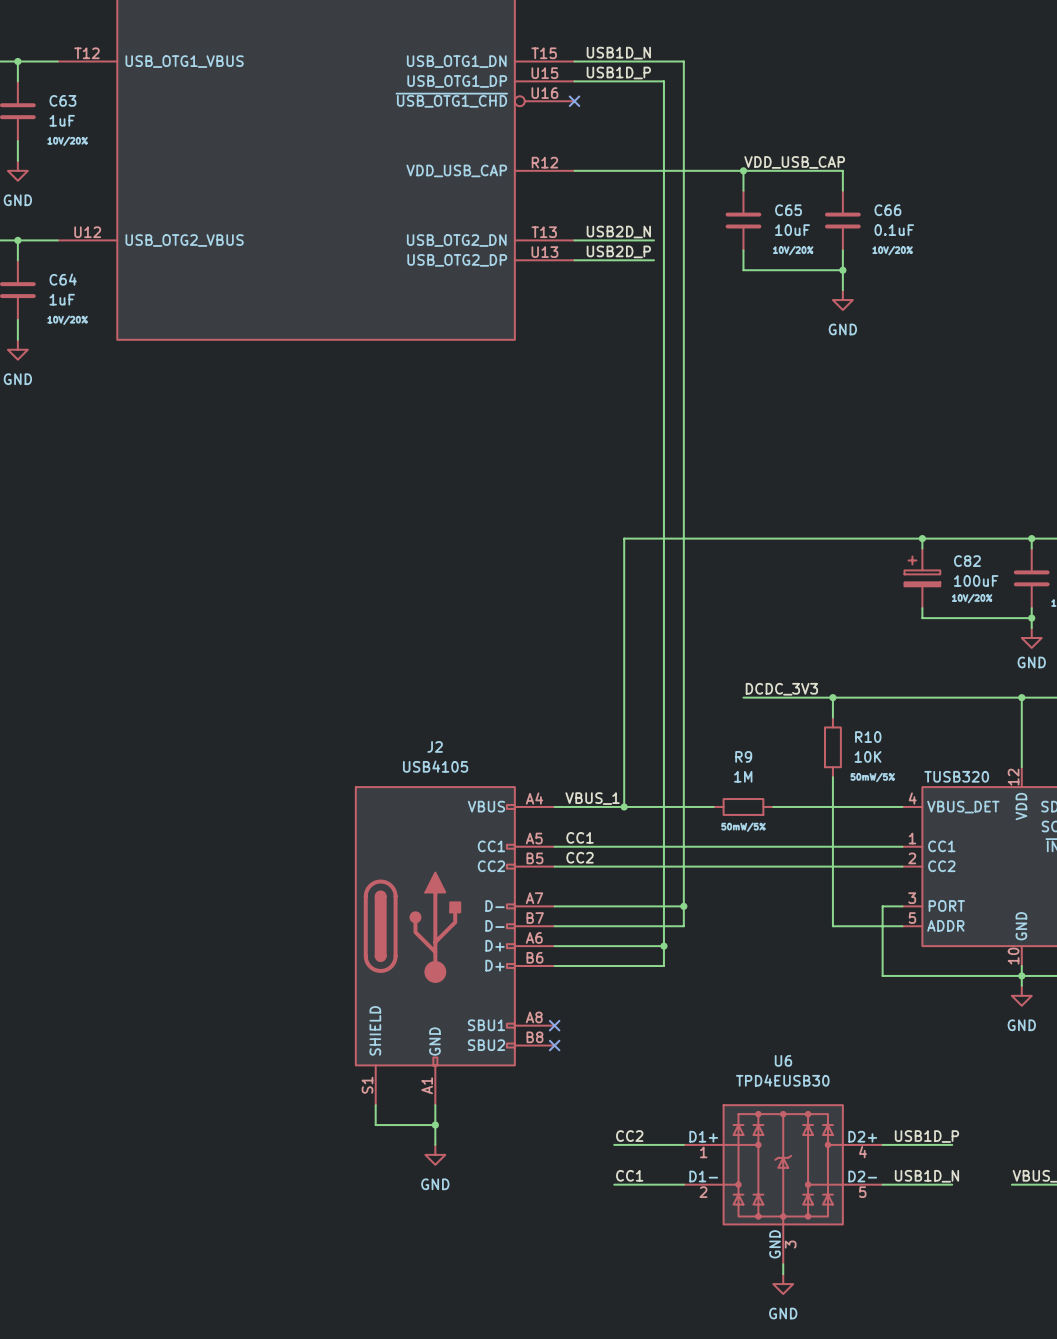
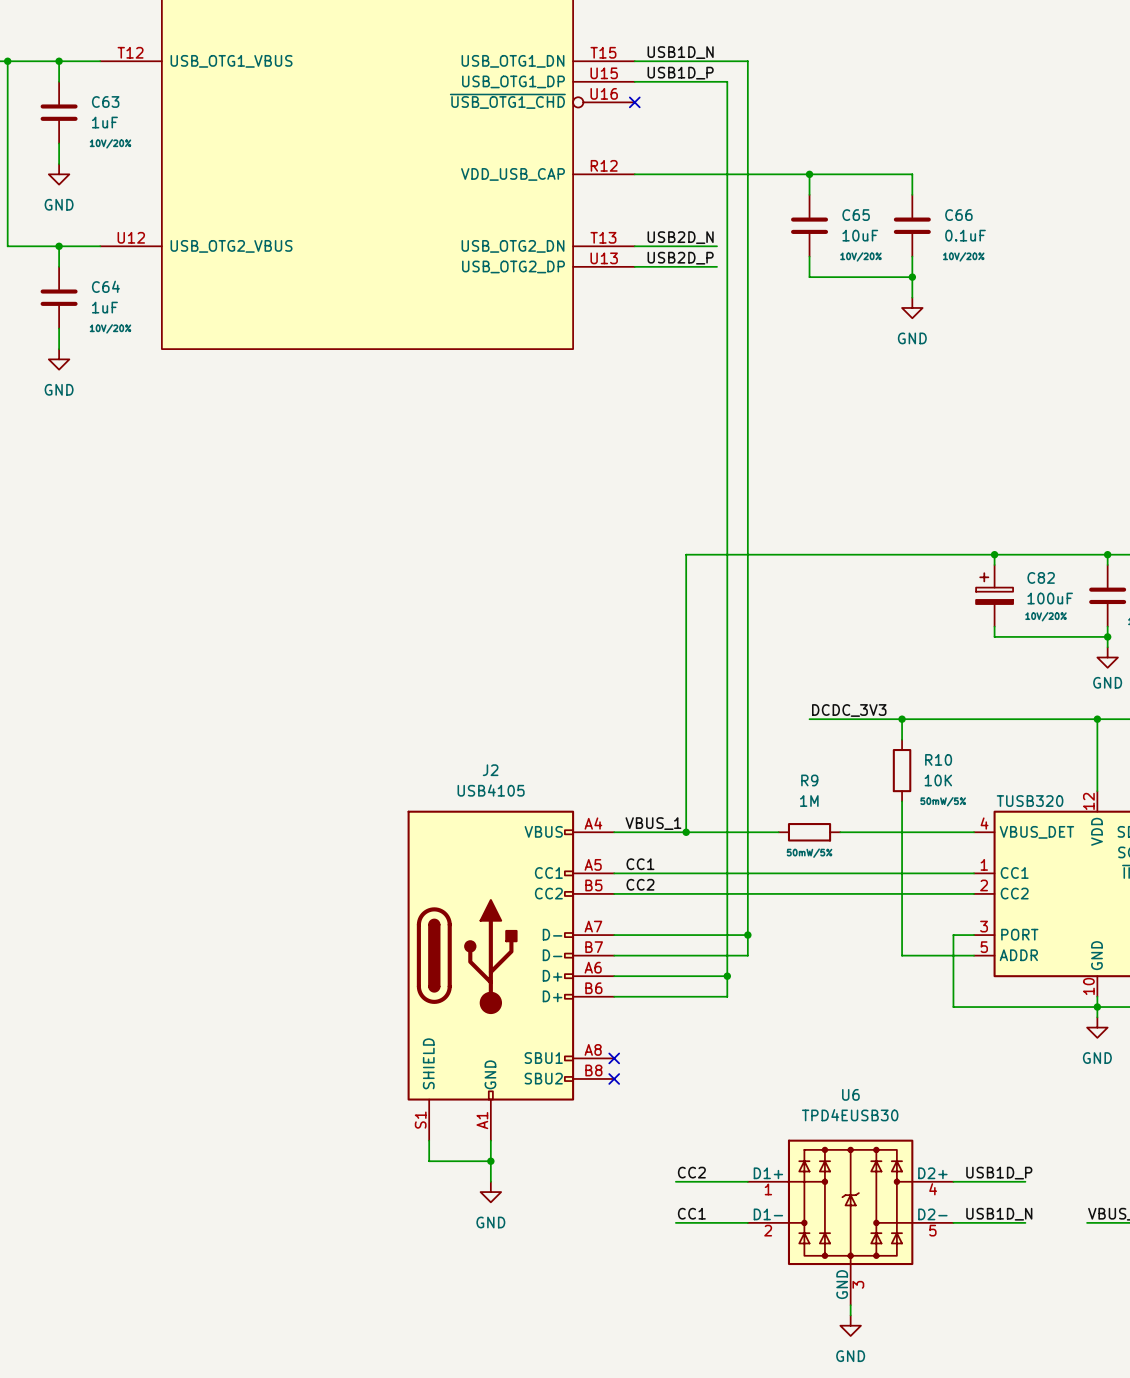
label: VDD_USB_CAP (794, 162) -> none

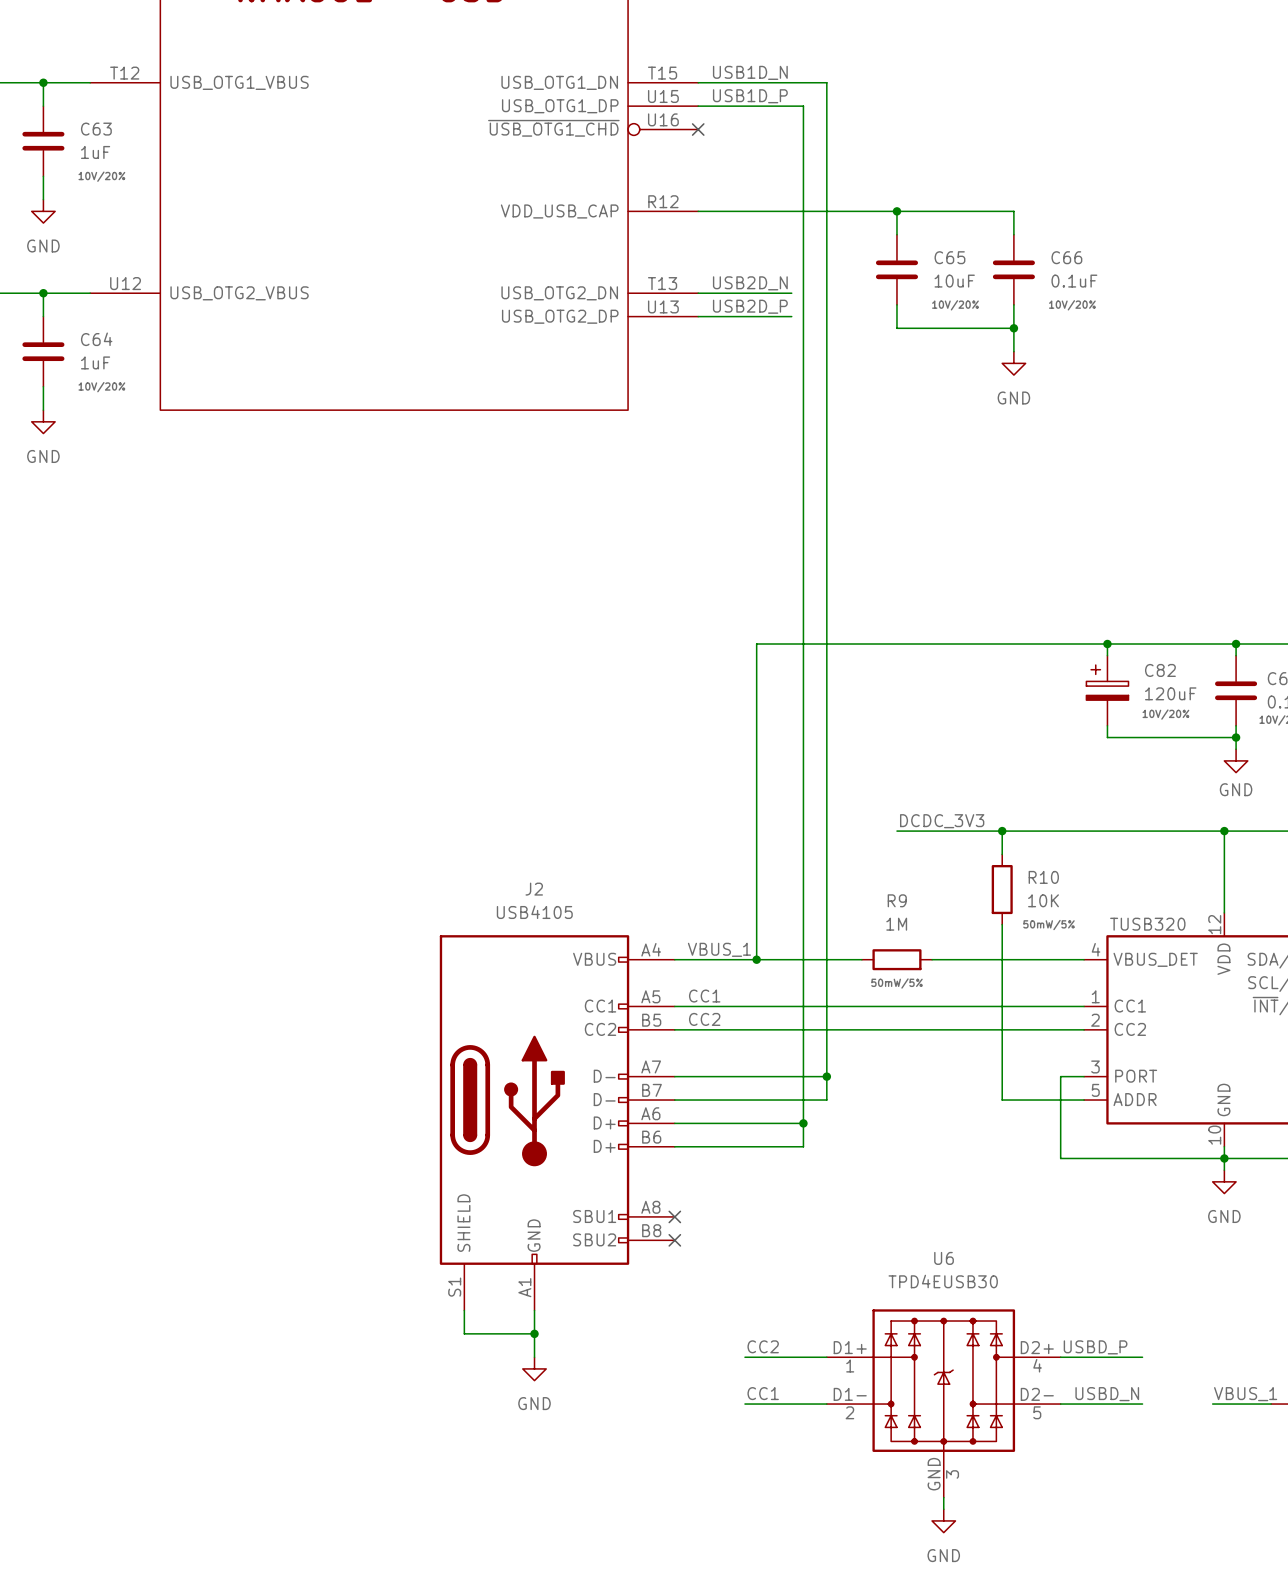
C82 value: 100uF (1050, 598) -> 120uF (1170, 693)
label: USB1D_P (999, 1173) -> USBD_P (1095, 1347)
label: USB1D_N (999, 1214) -> USBD_N (1107, 1394)

